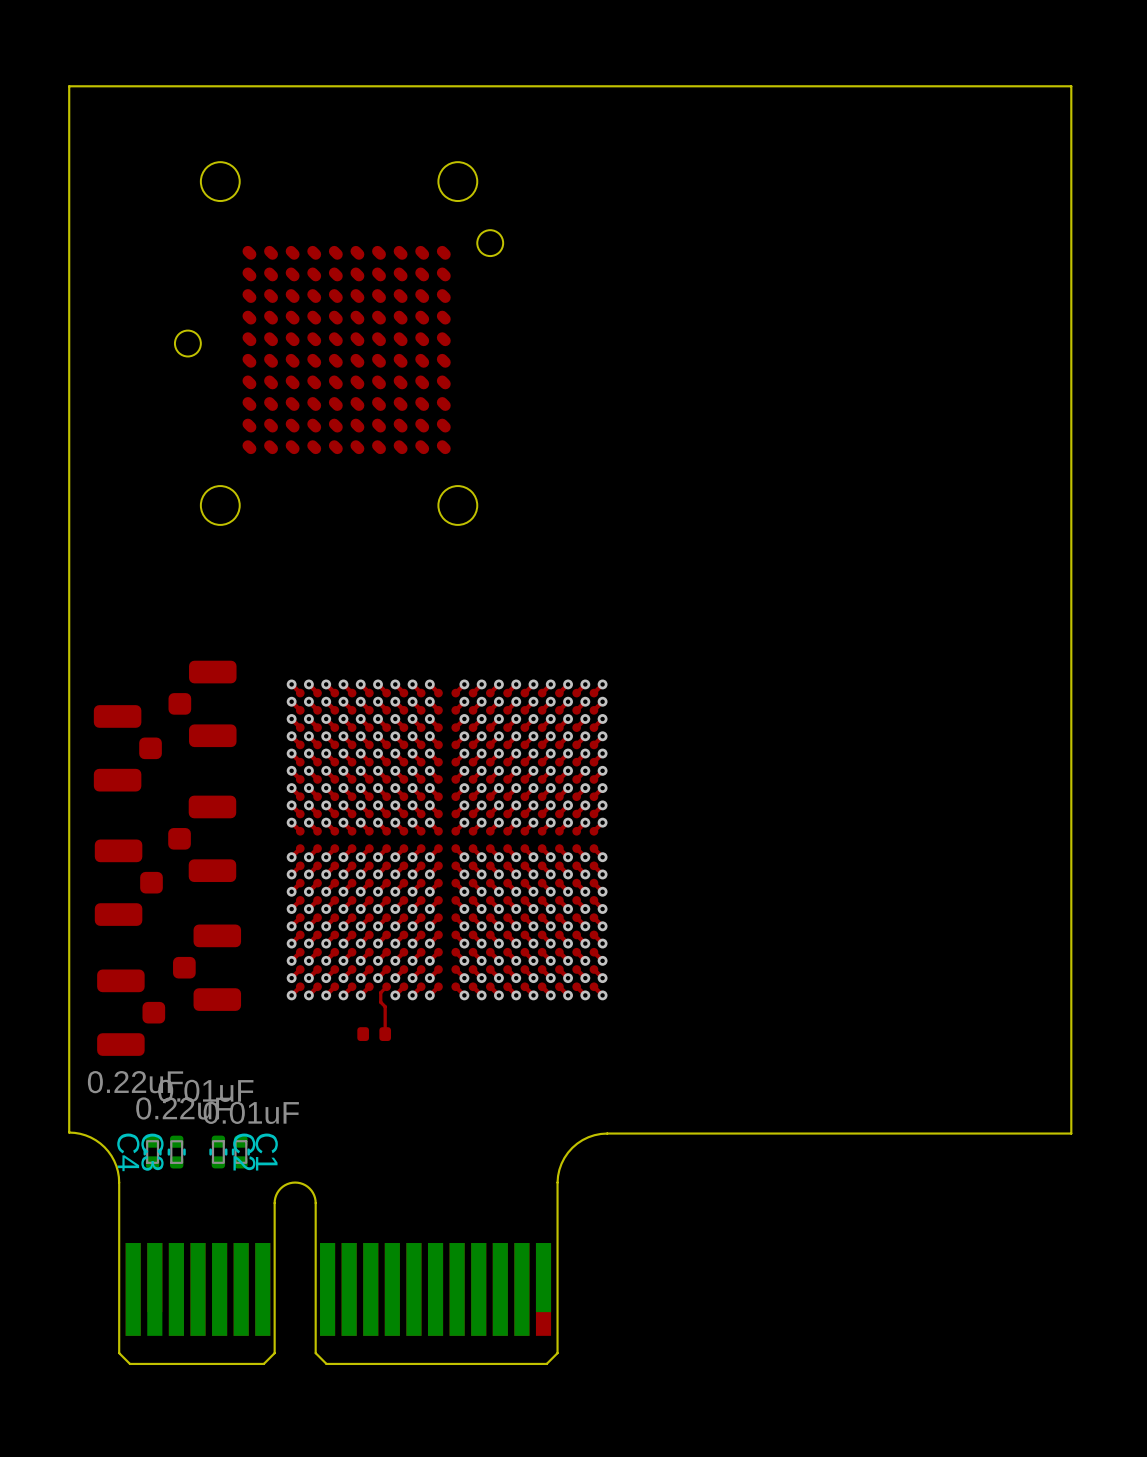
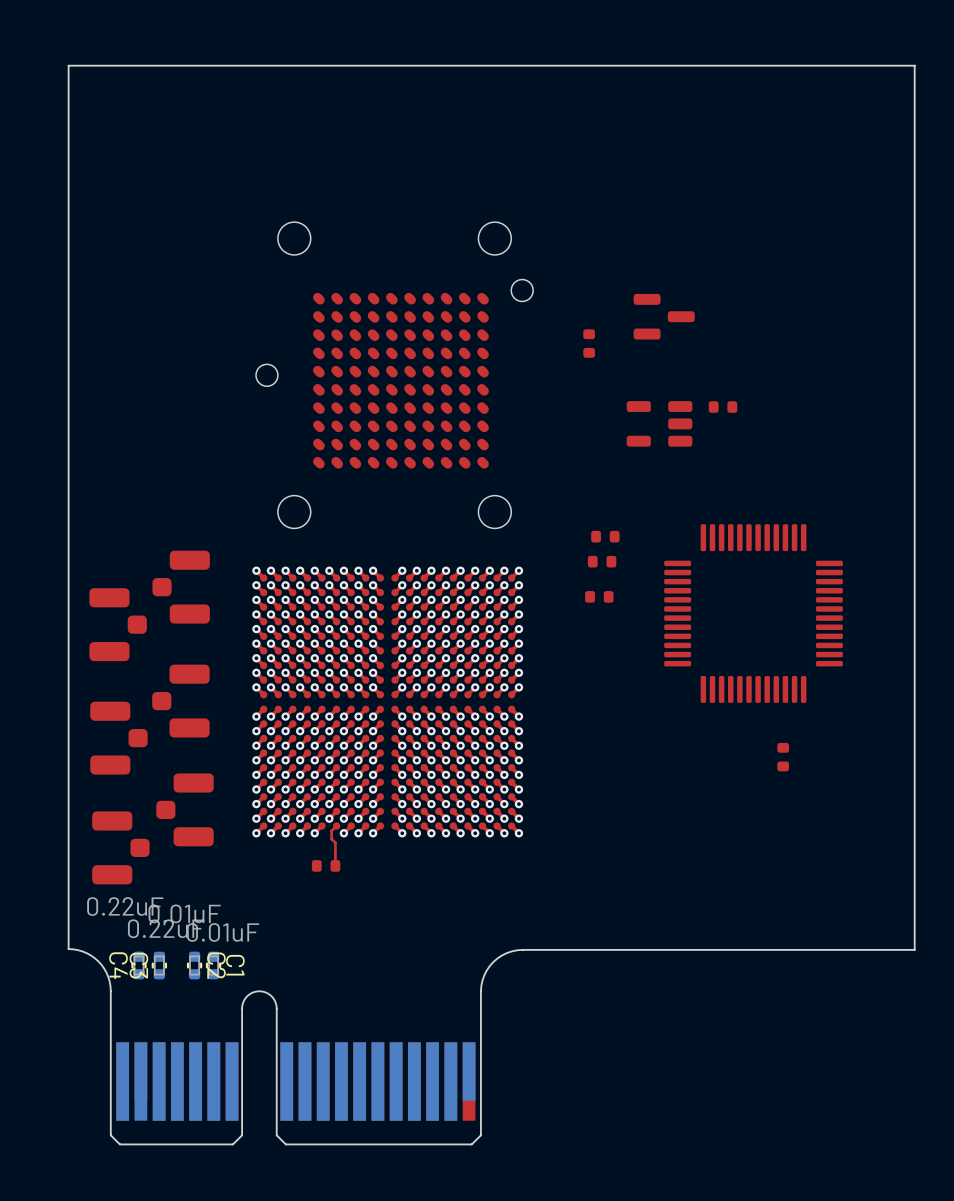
part position: (339, 343) -> (394, 375)
part: none -> (664, 316)
part: none -> (589, 343)
part: none -> (723, 407)
part: none -> (659, 423)
part: none -> (605, 536)
part: none -> (602, 561)
part: none -> (599, 596)
part: none -> (753, 613)
part: none -> (783, 757)

